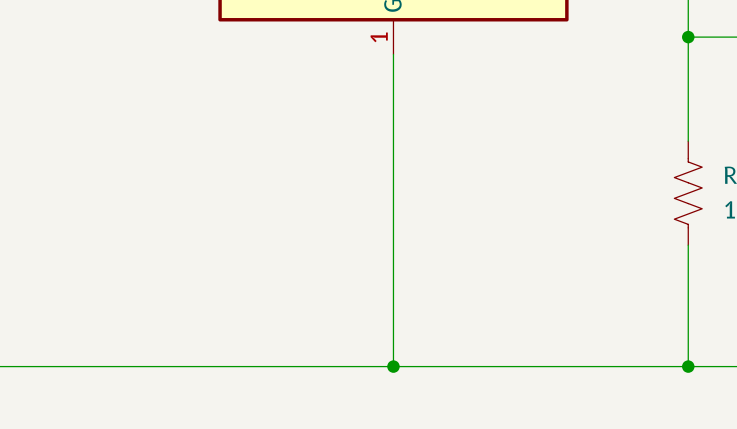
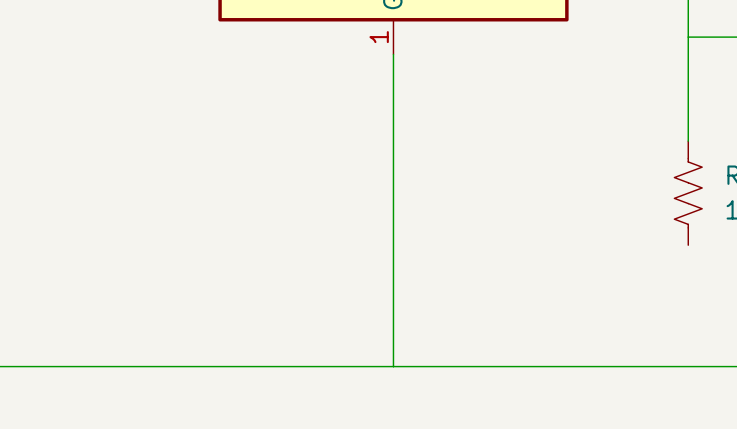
junction: (688, 37) -> none
wire: (688, 245) (688, 366) -> none
junction: (393, 366) -> none
junction: (688, 366) -> none

